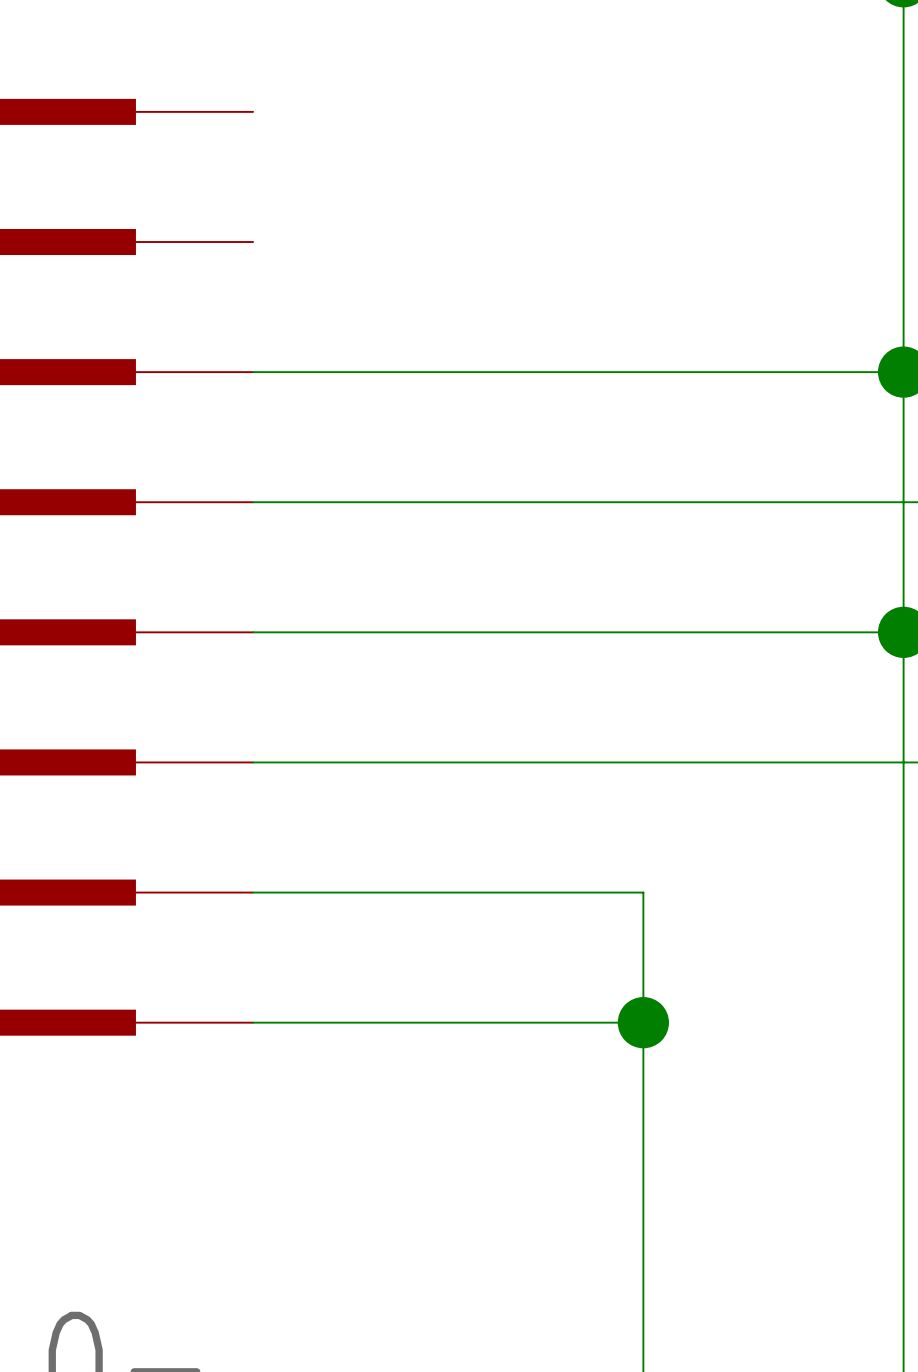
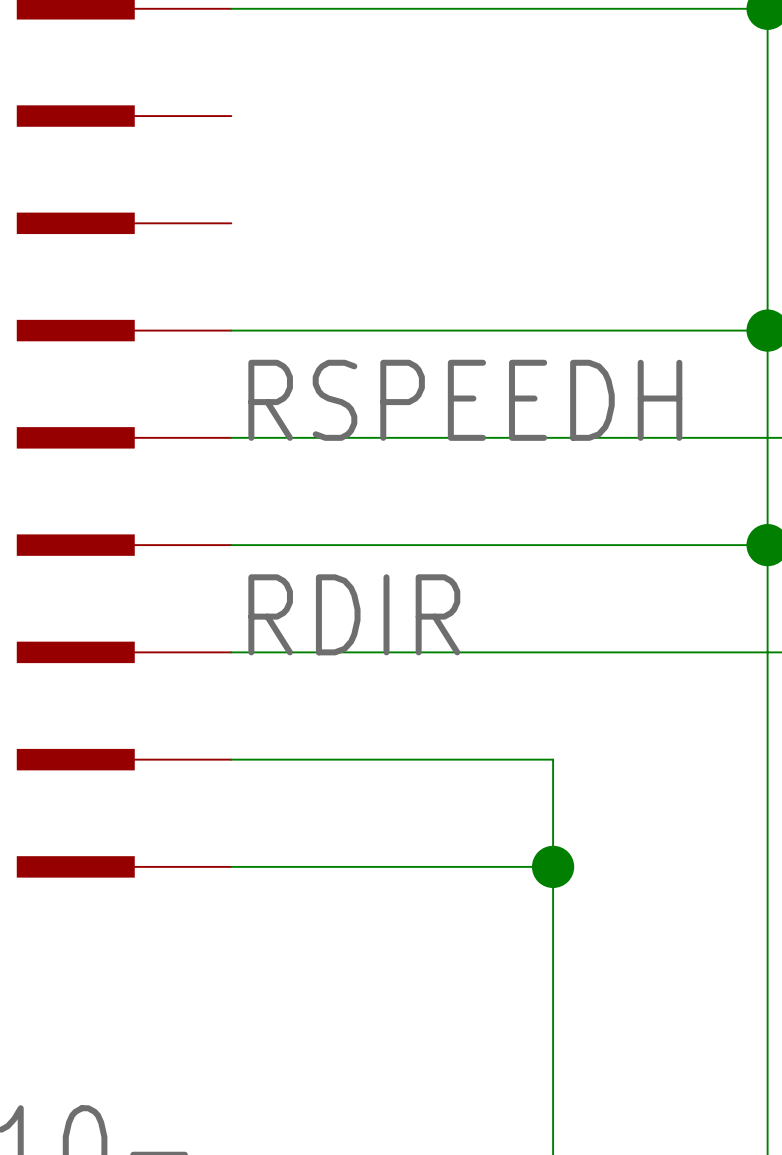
label: none -> RSPEEDH (465, 400)
label: none -> RDIR (354, 614)

